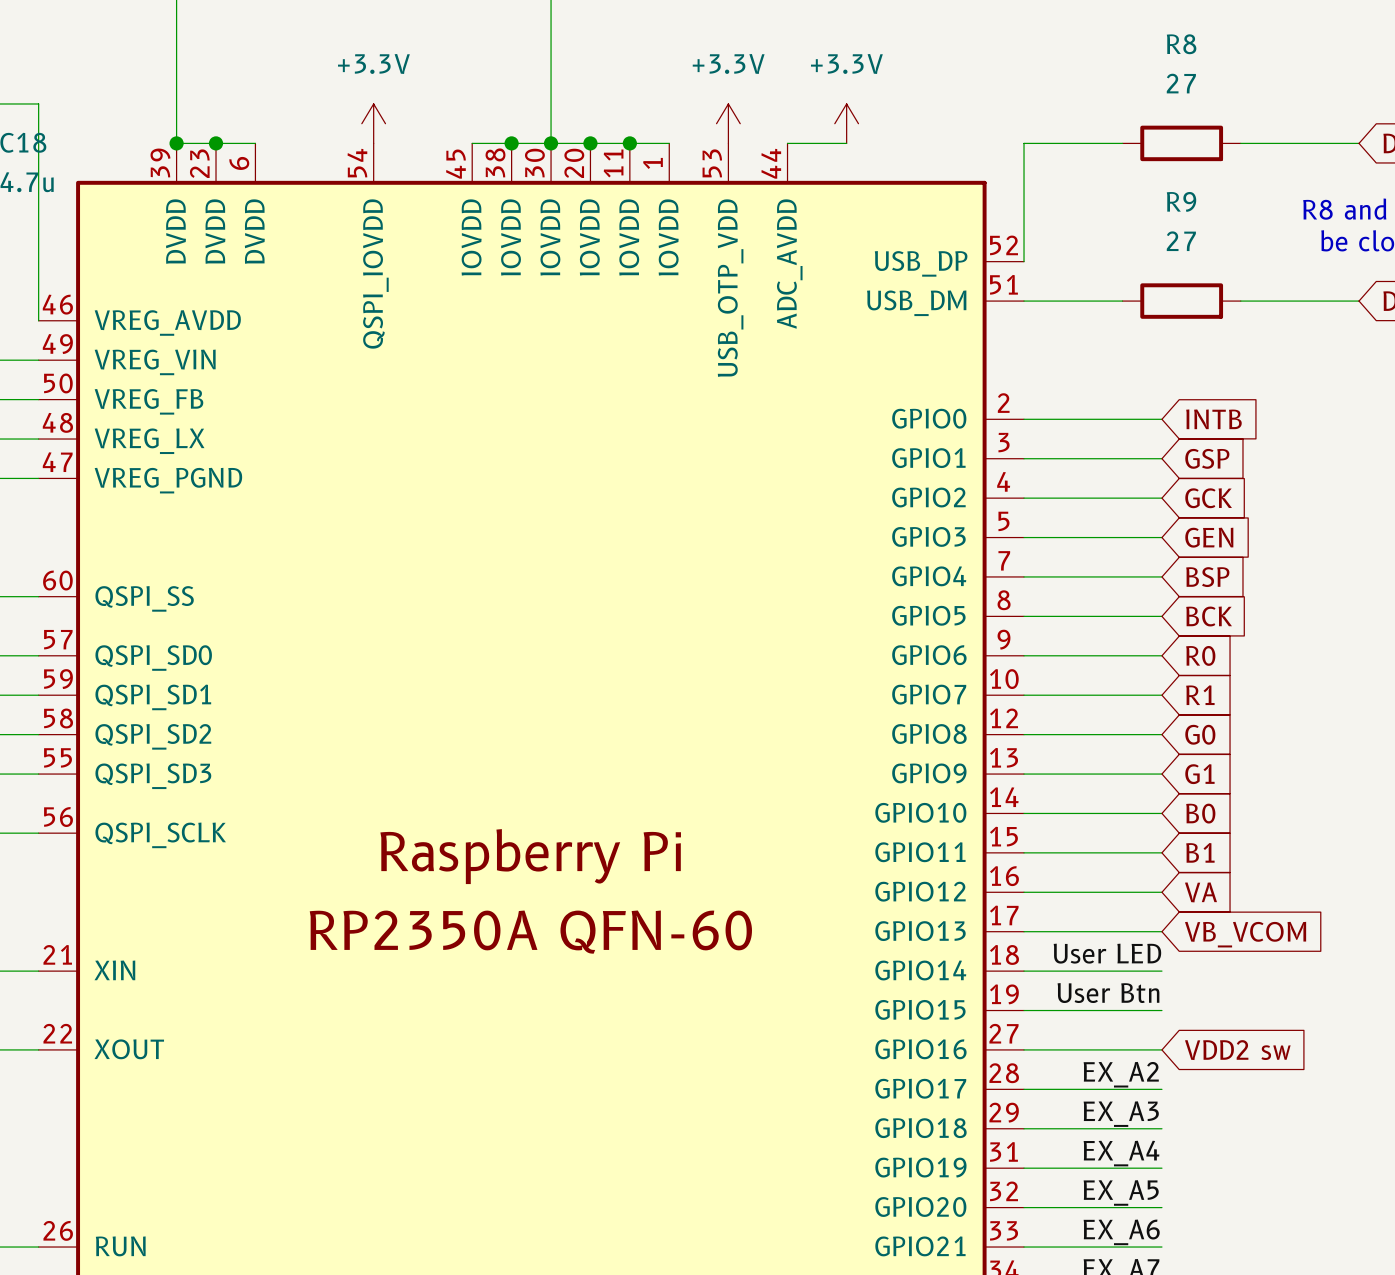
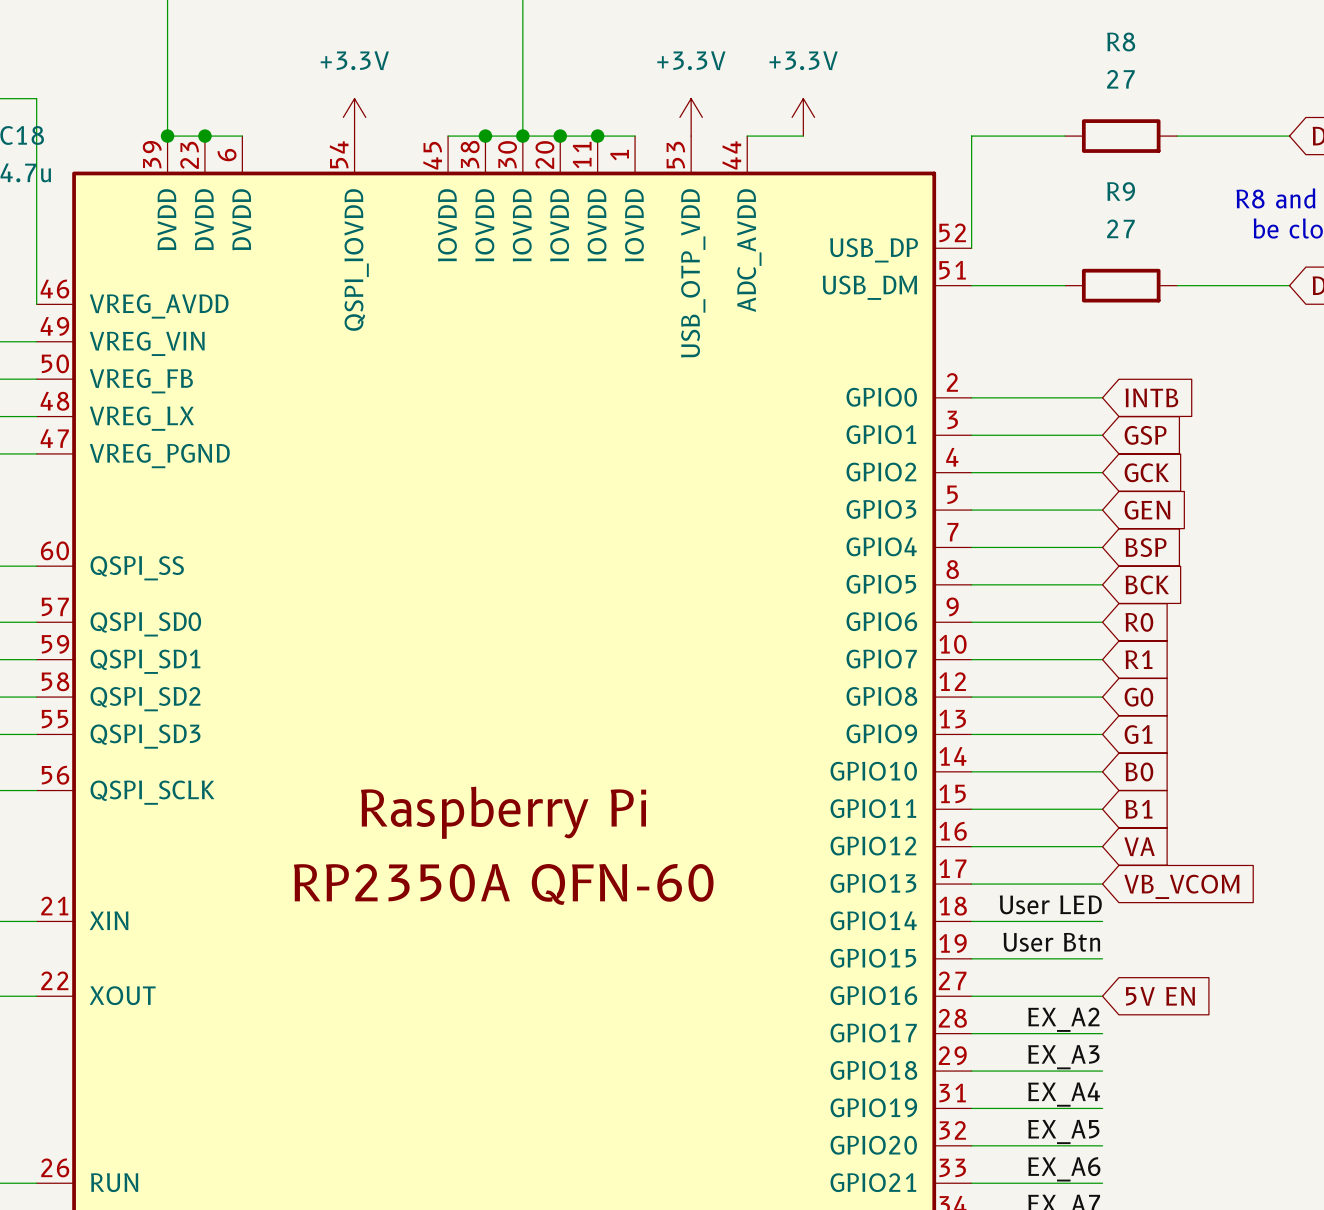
global label: VDD2 sw (1237, 1050) -> 5V EN (1160, 996)

